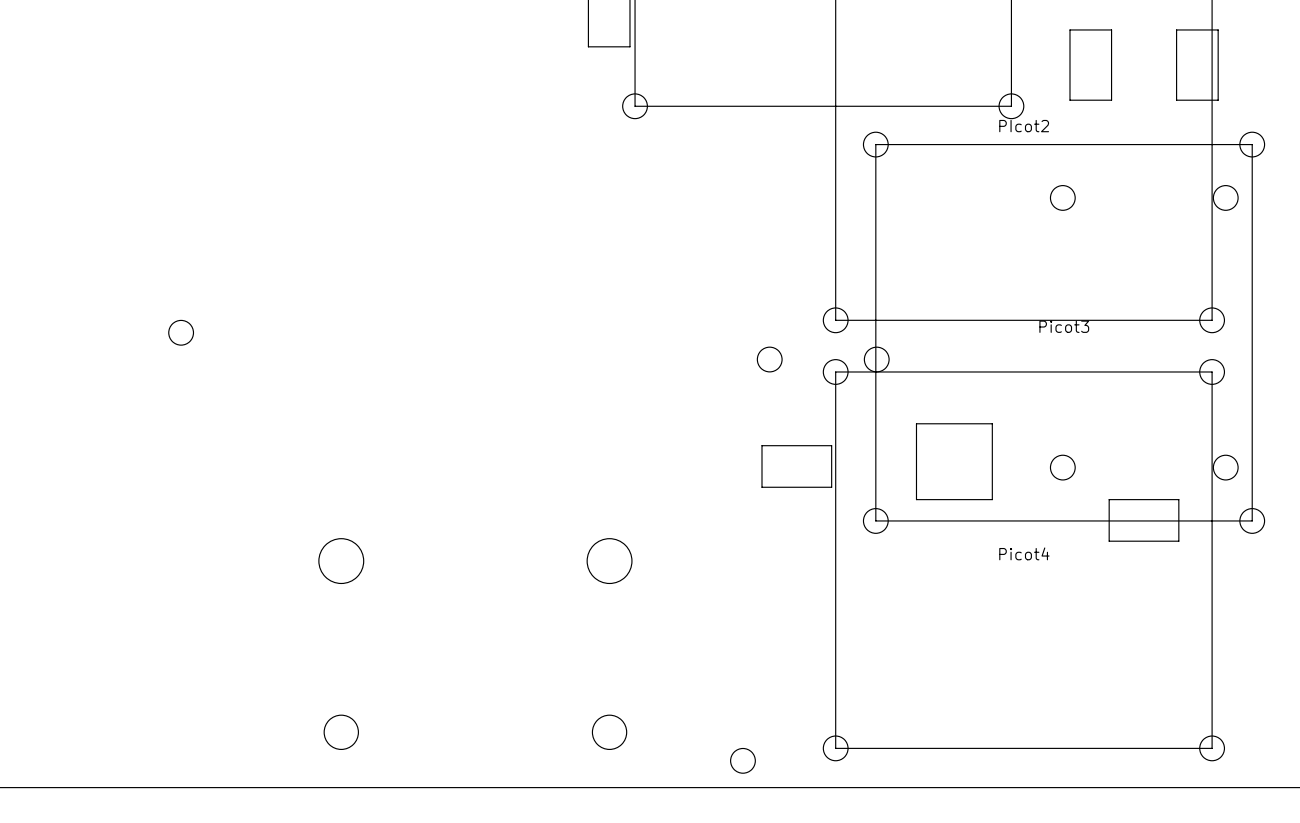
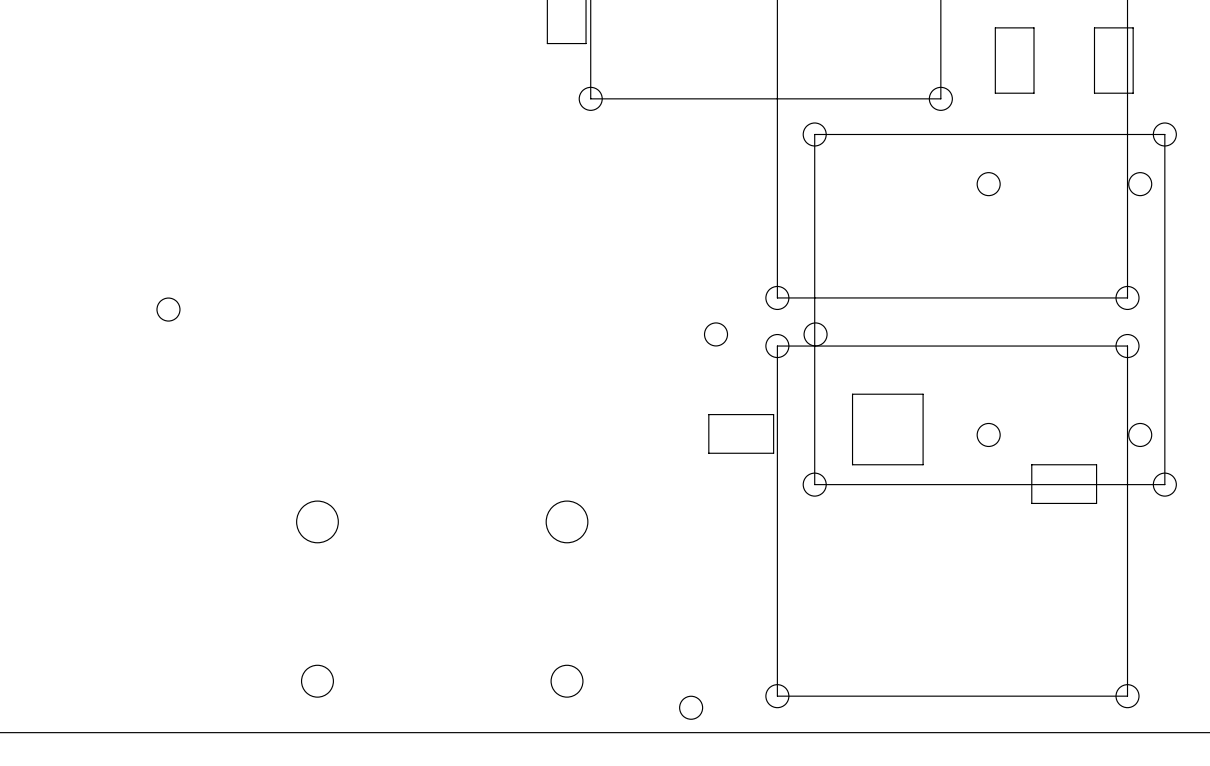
PIcot2 name: PIcot2 (1024, 126) -> none
Picot3 name: Picot3 (1064, 326) -> none
Picot4 name: Picot4 (1024, 553) -> none

